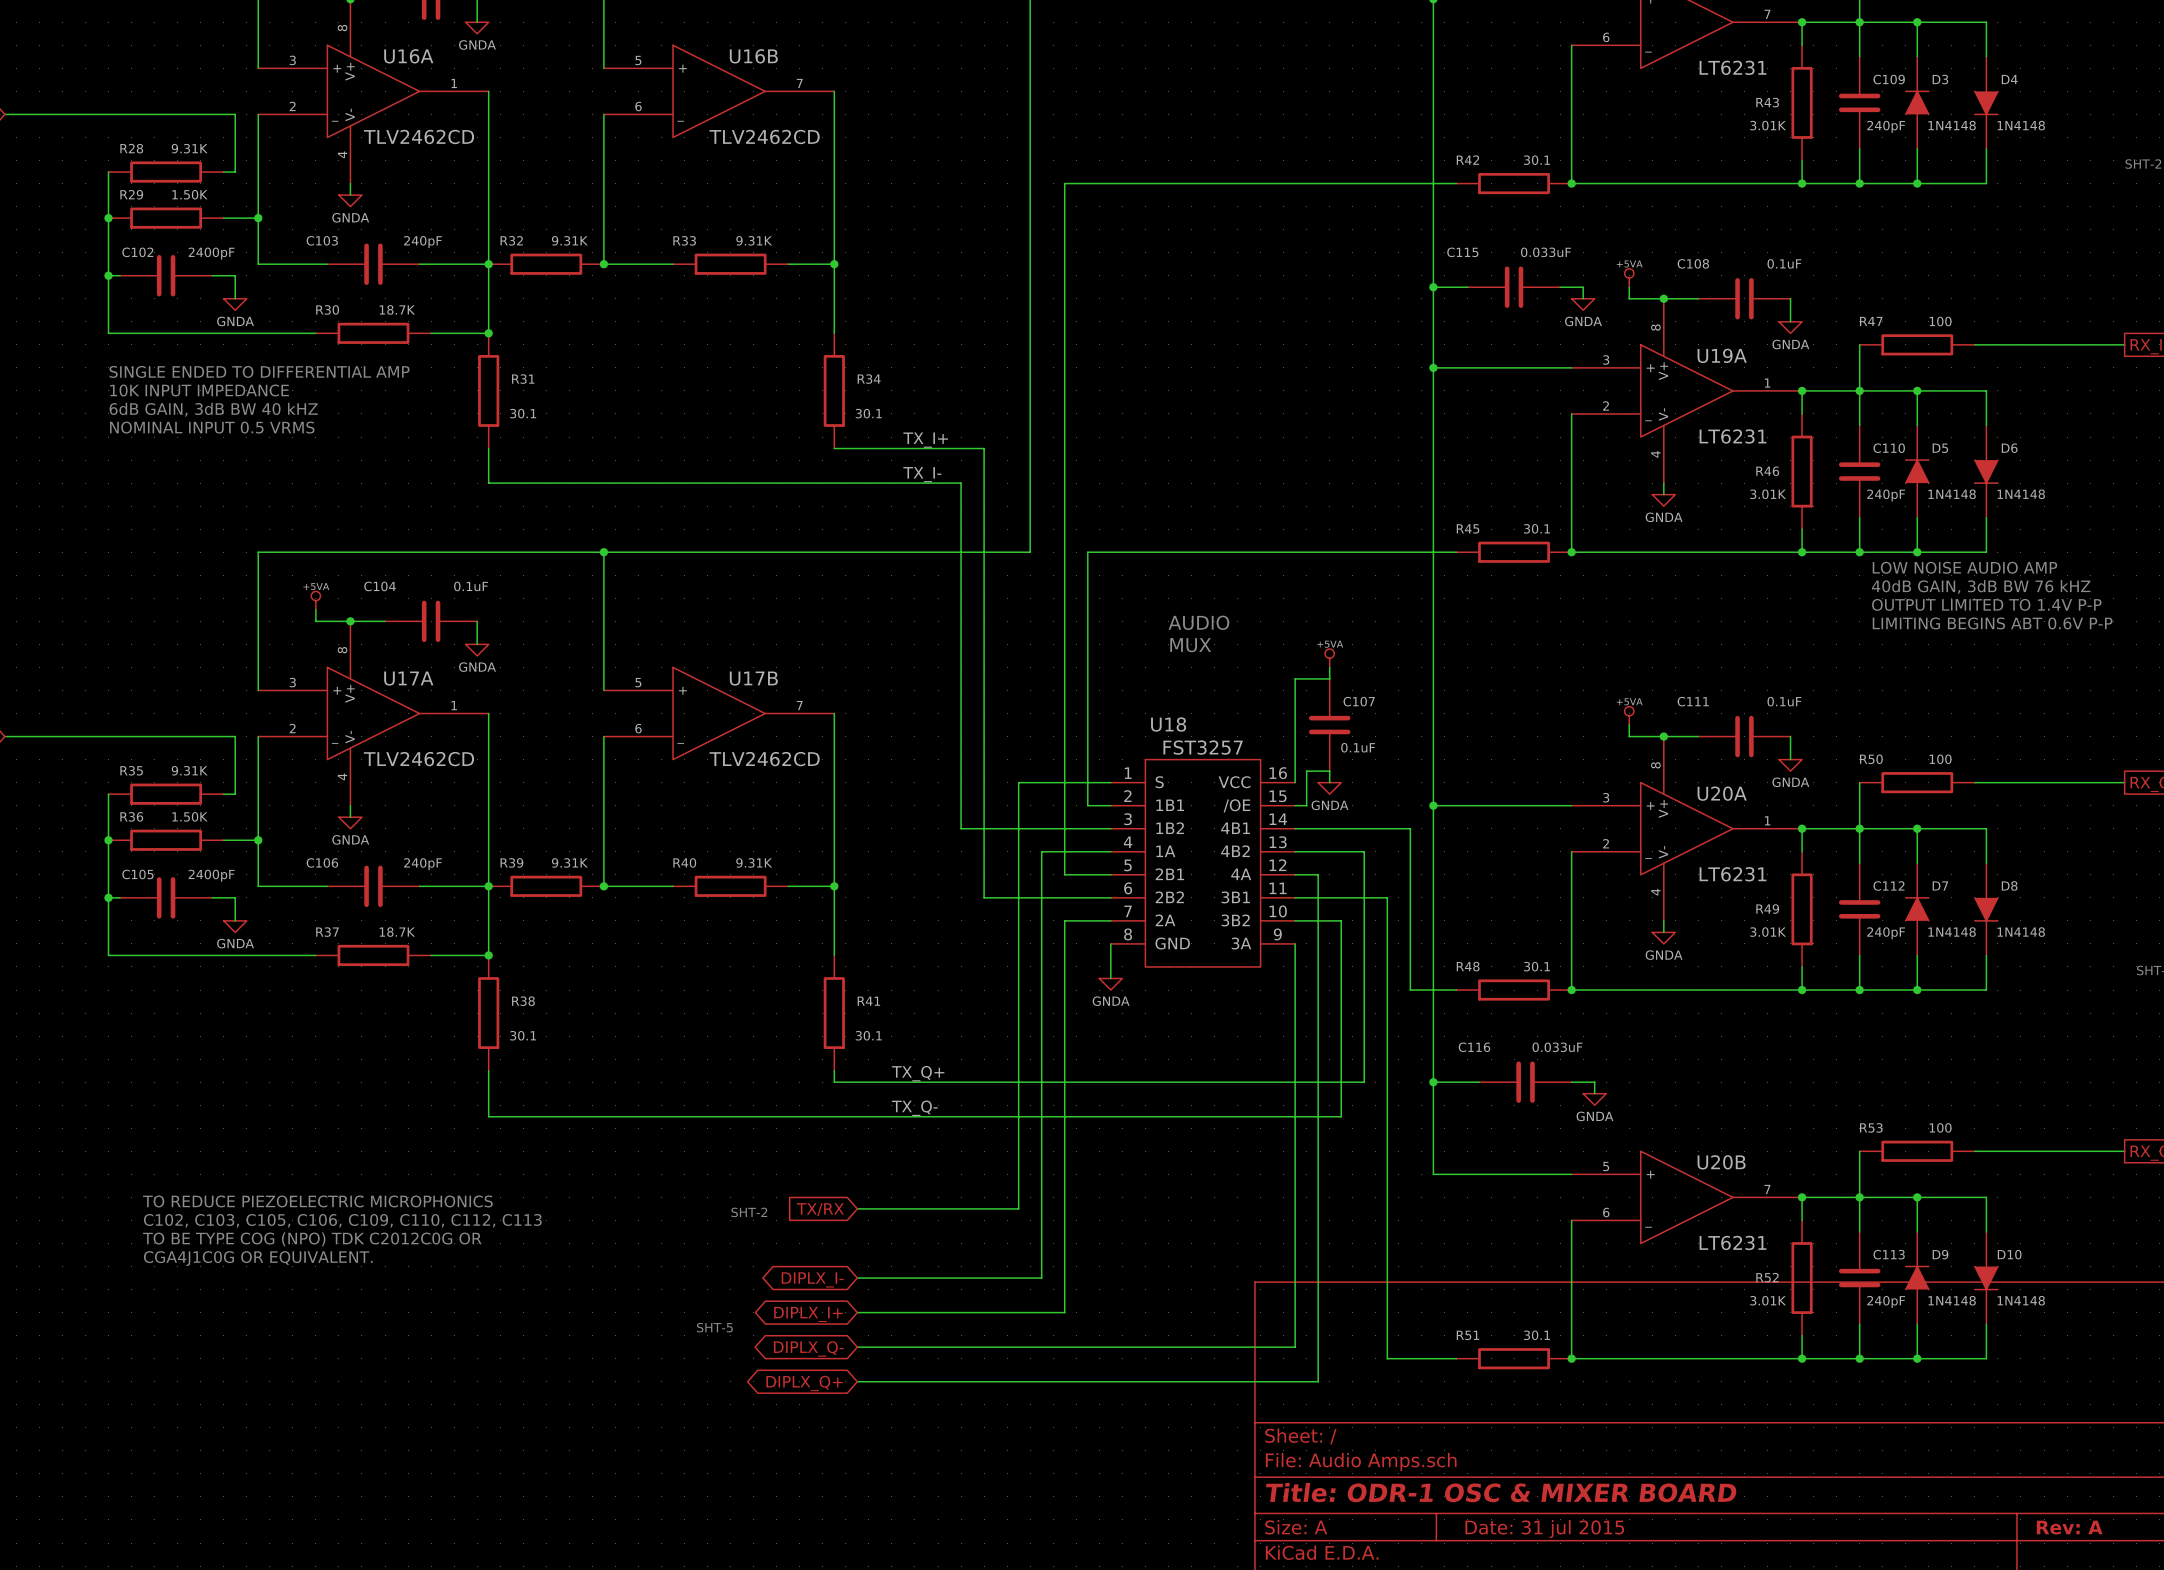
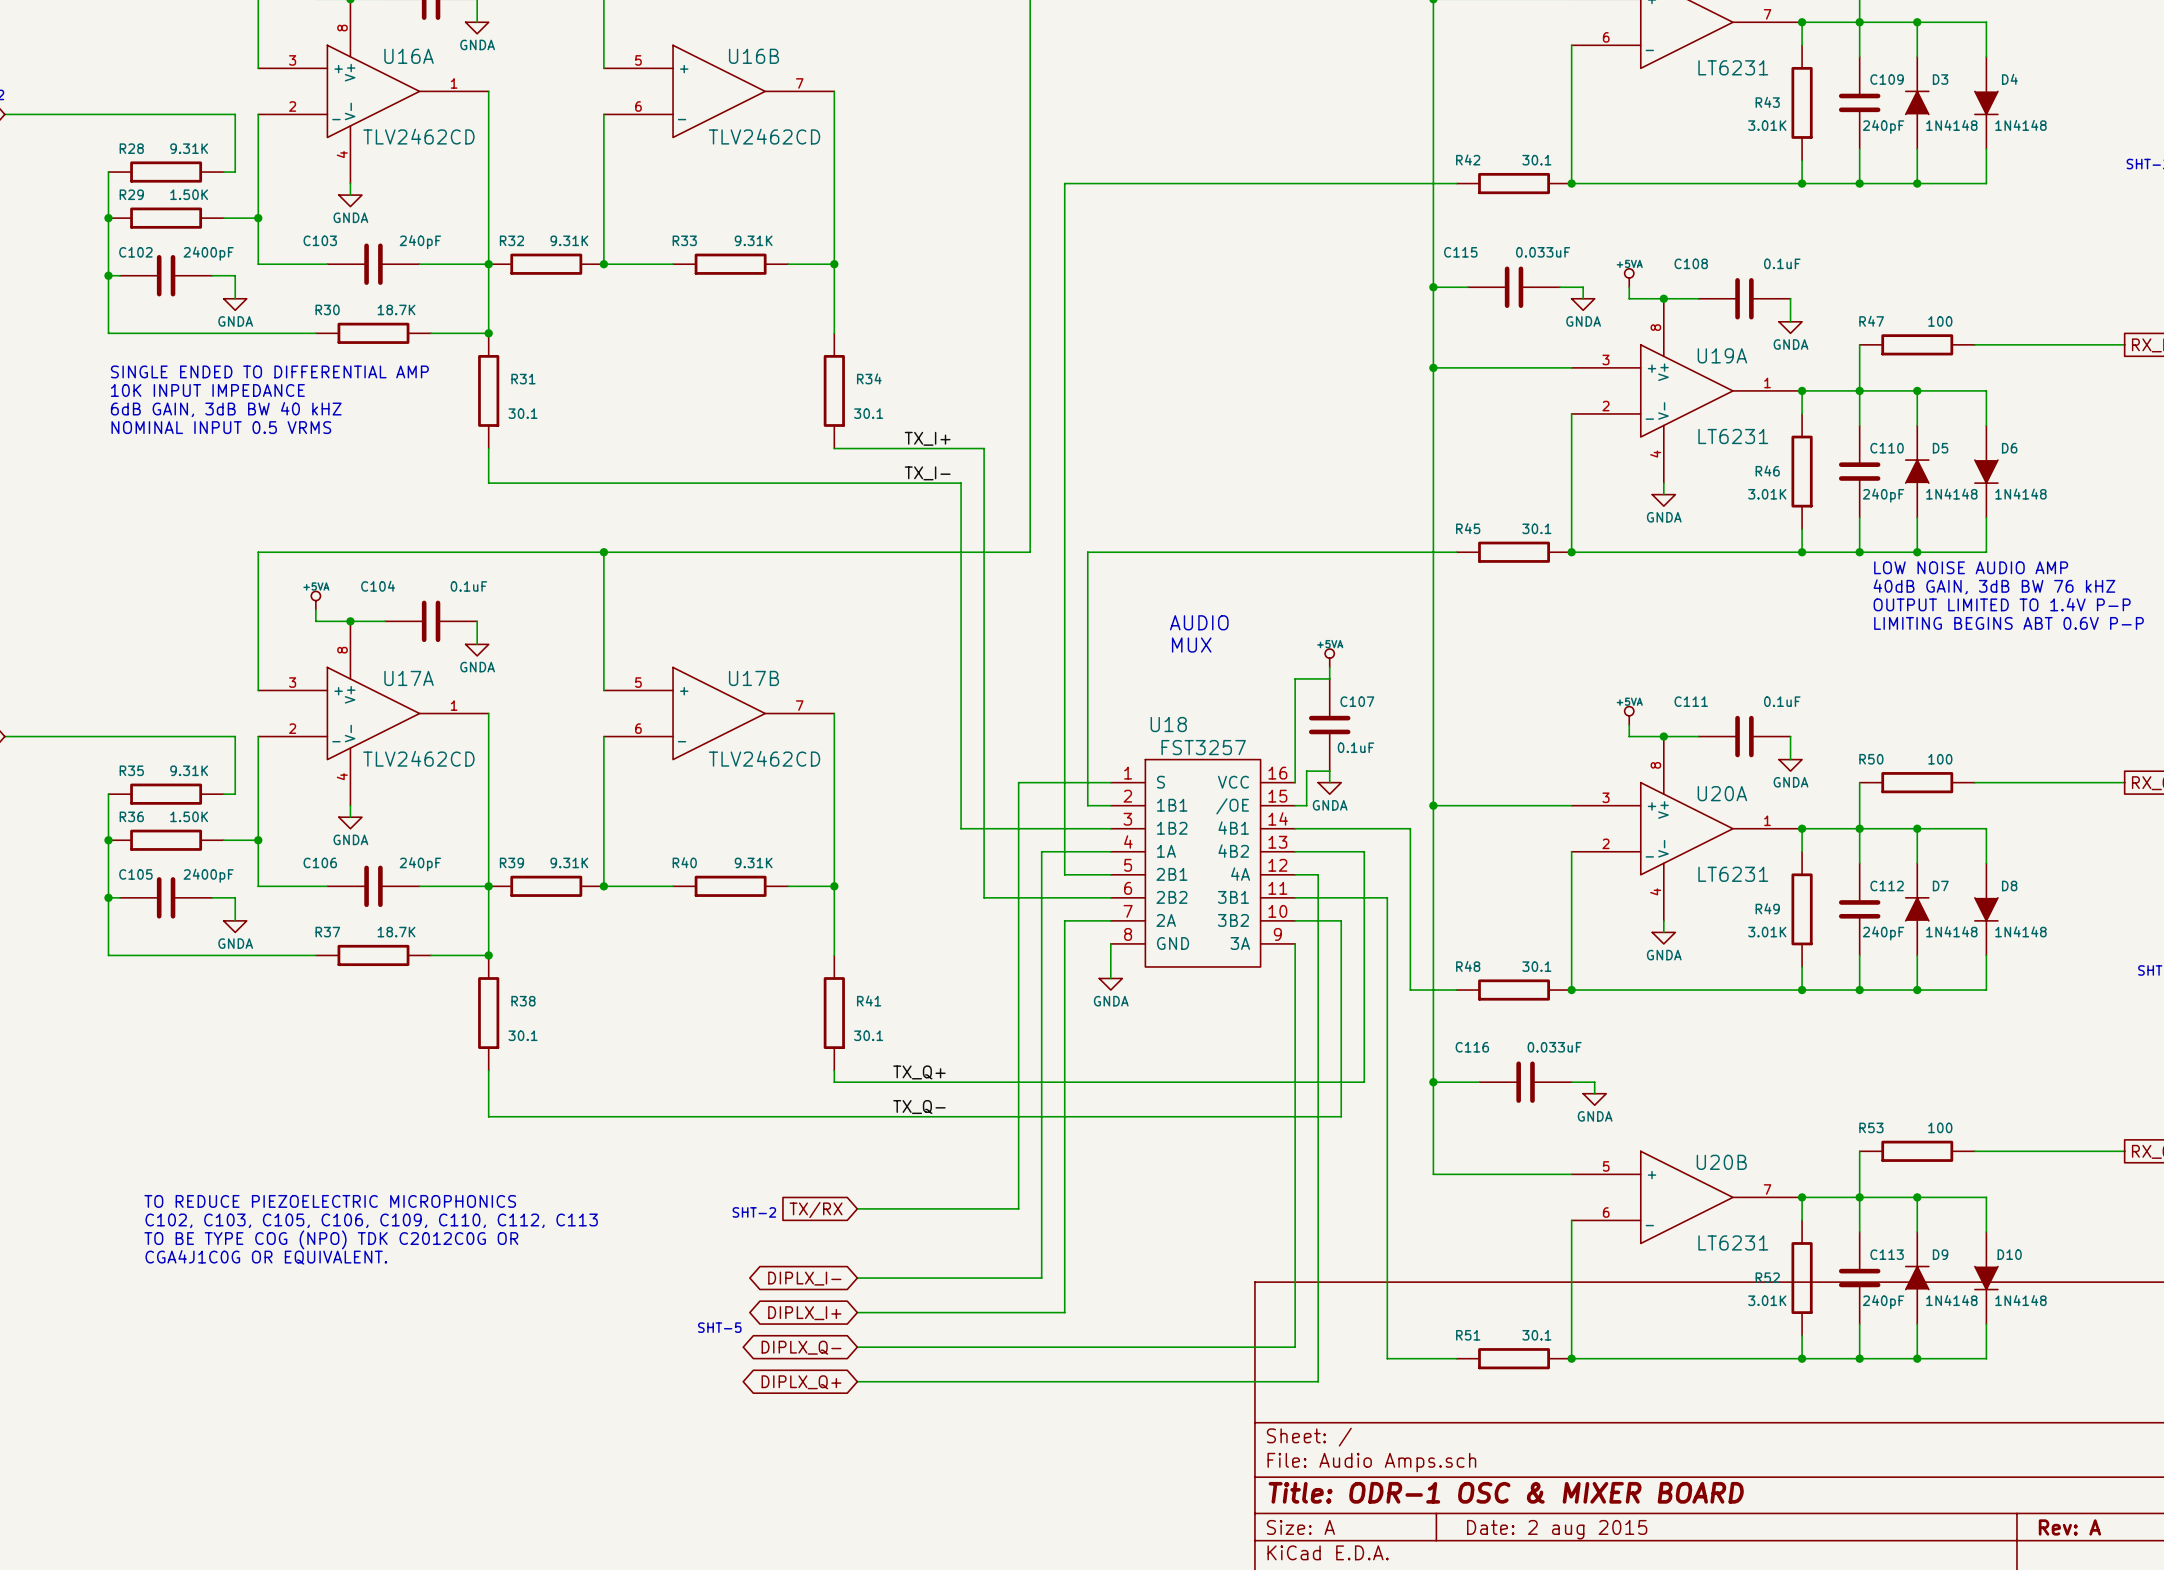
title block: Date: 31 jul 2015 (1544, 1529) -> Date: 2 aug 2015 (1557, 1529)

